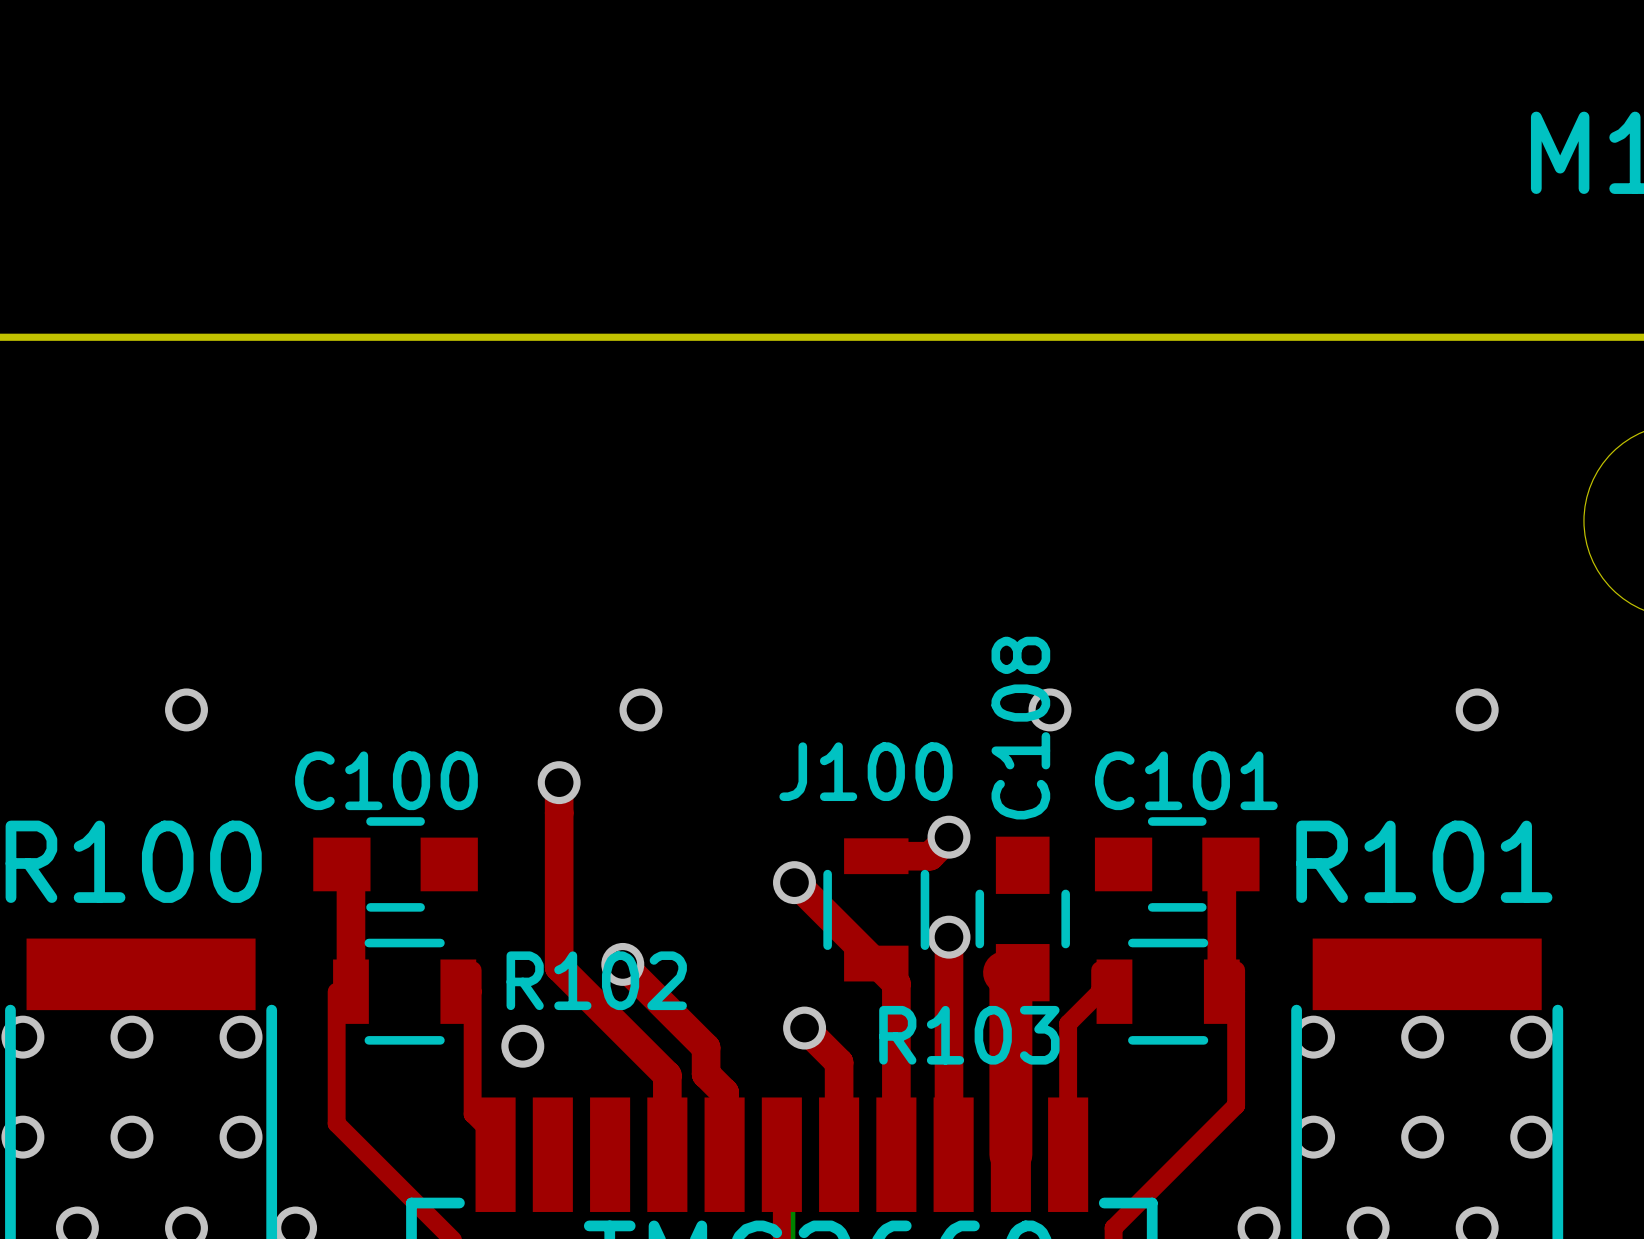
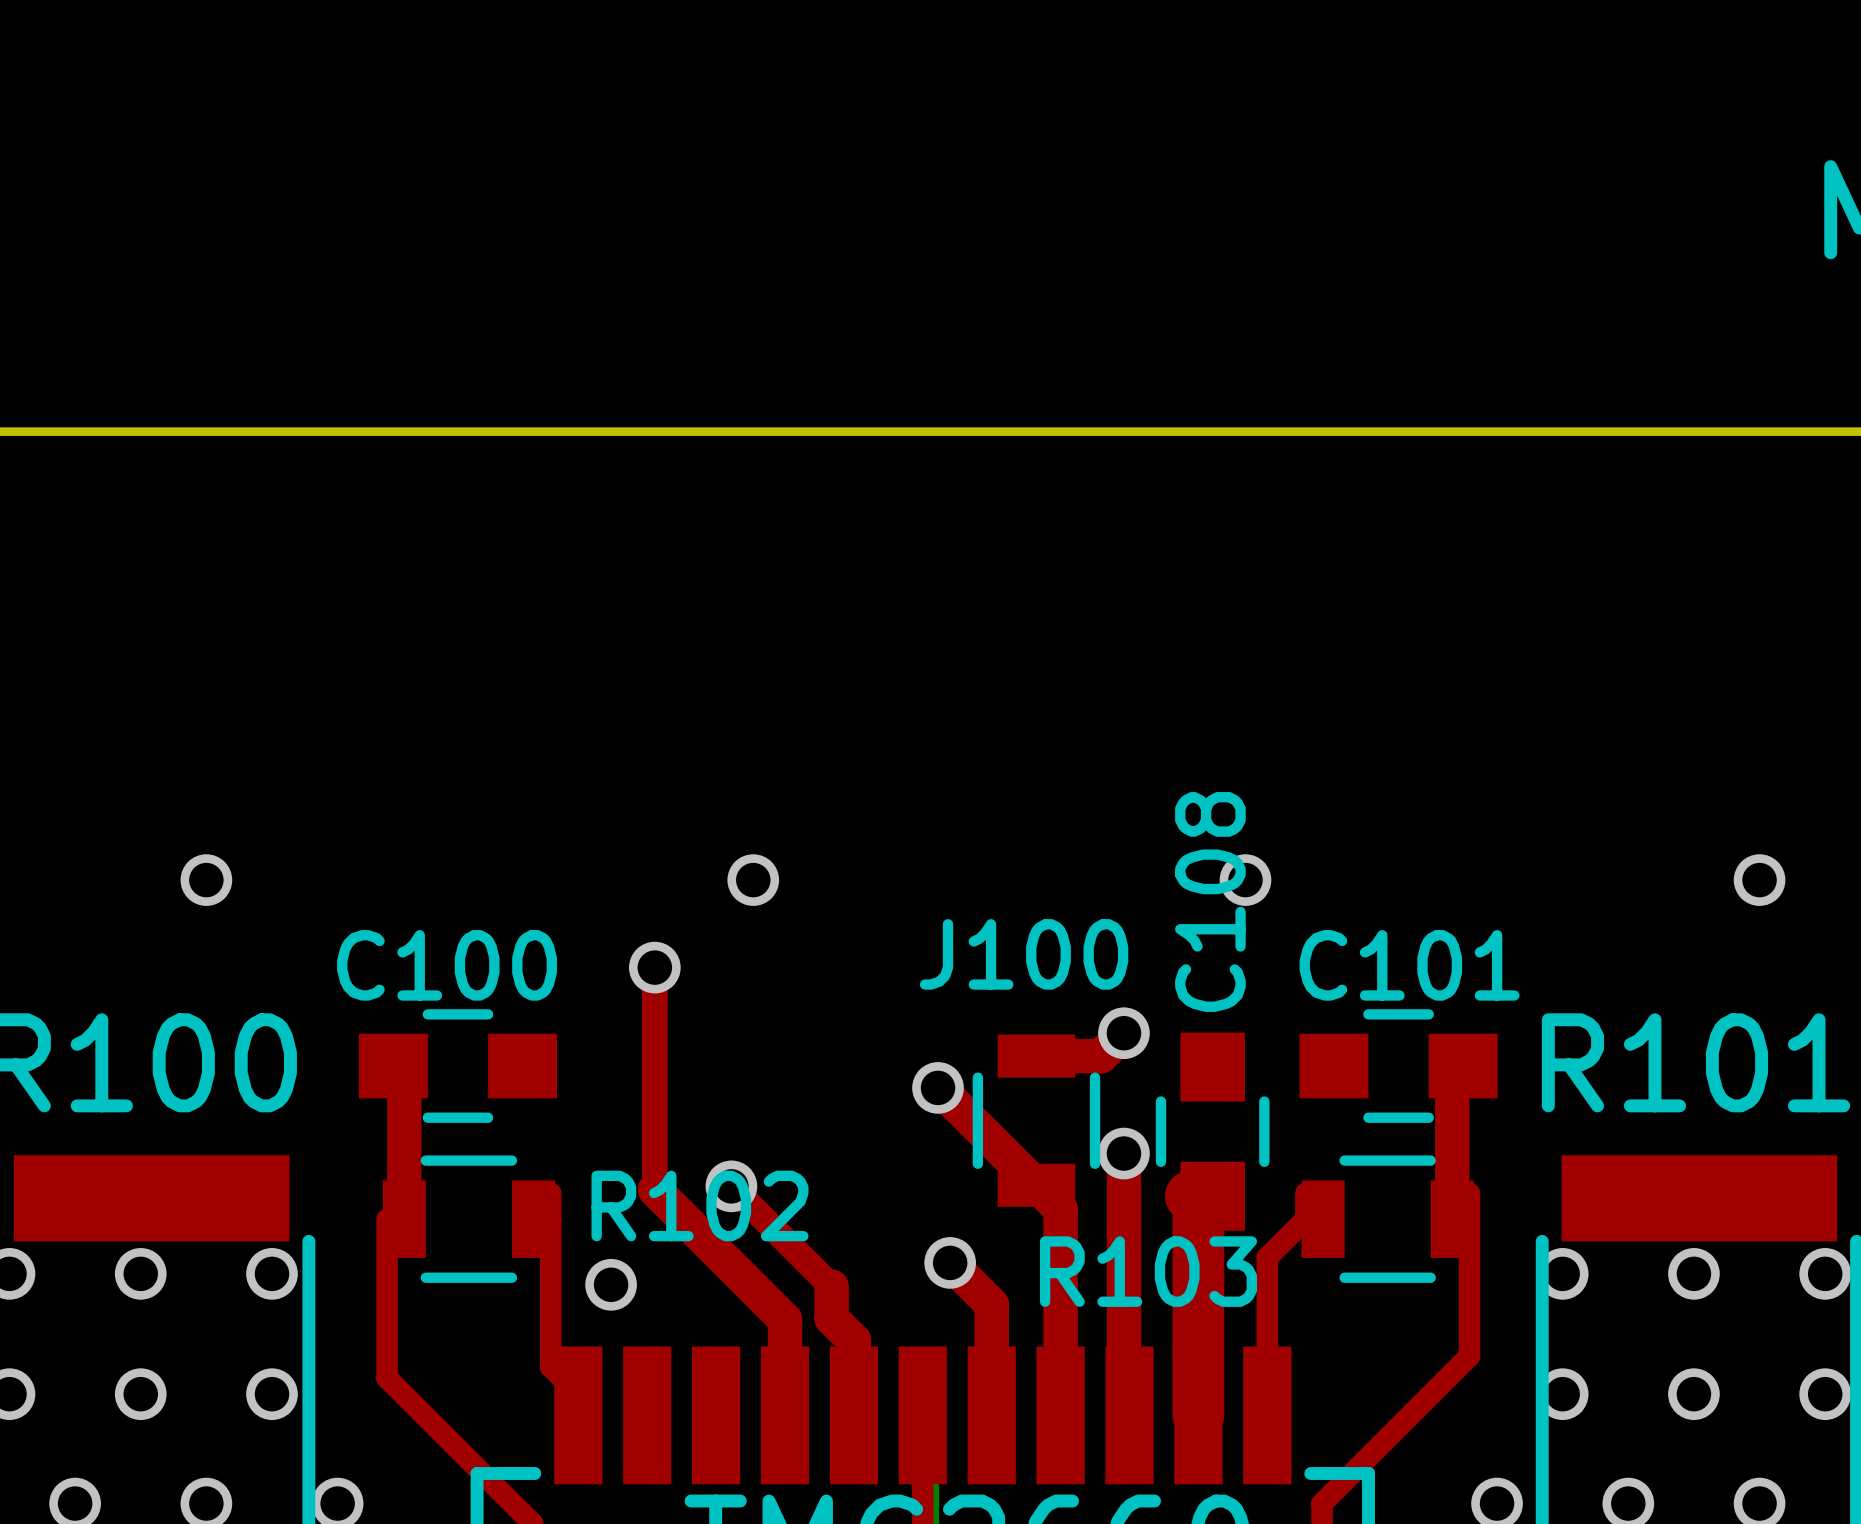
top track width: thick (559, 782) (559, 967) -> thin (654, 967) (654, 1189)
top track width: thick (622, 964) (706, 1047) -> thin (731, 1186) (831, 1286)

